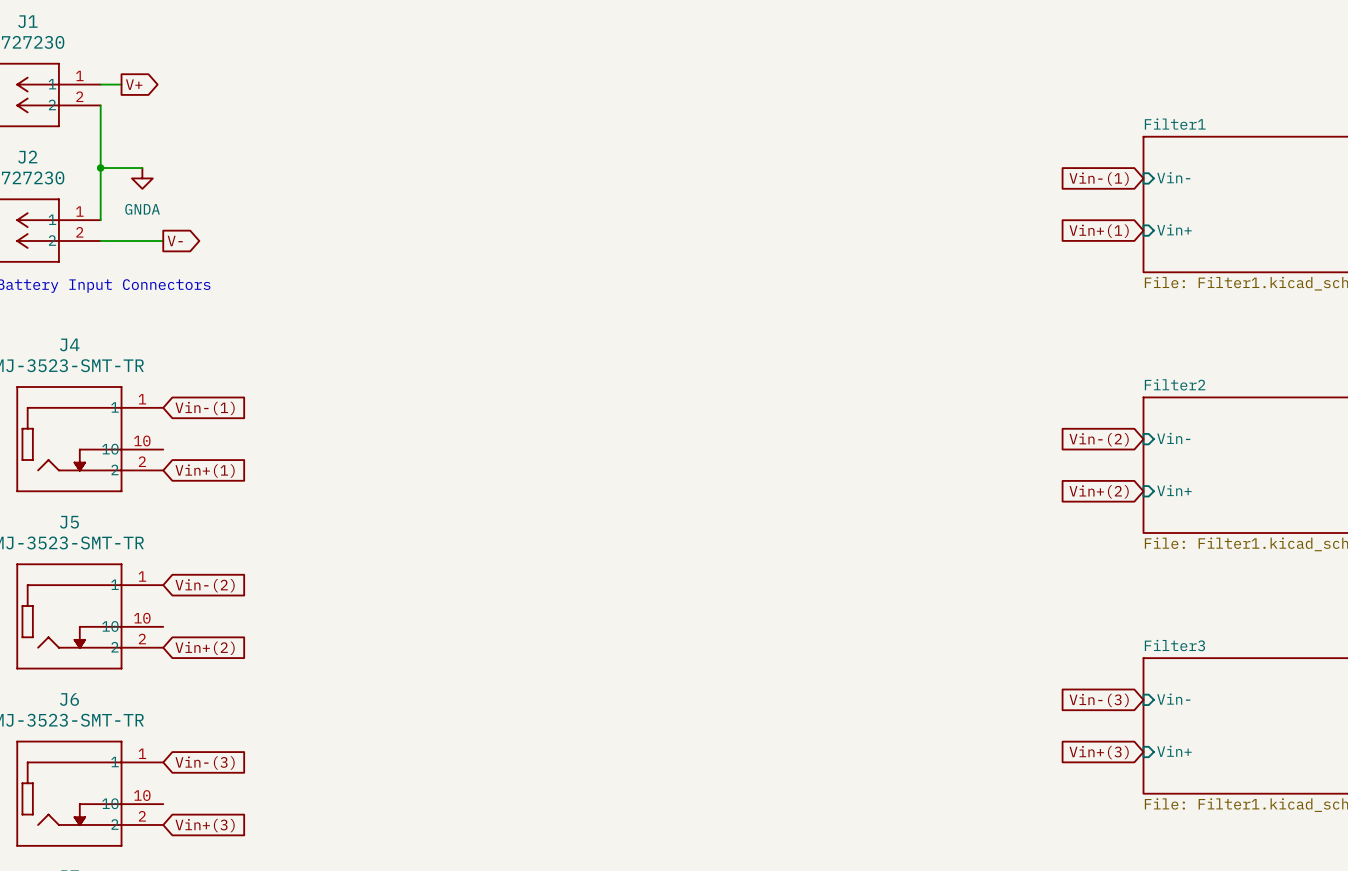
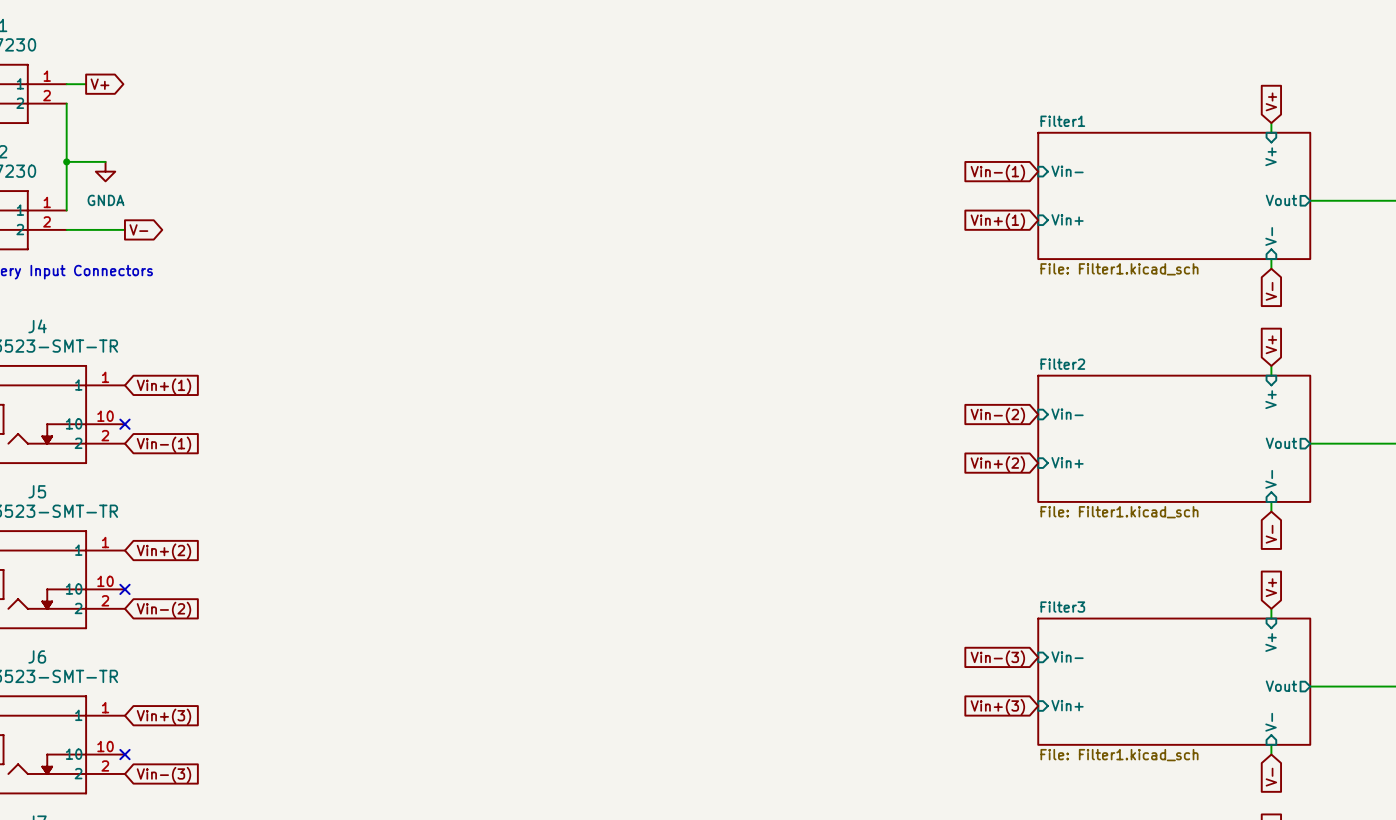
global label: Vin-(1) (205, 408) -> Vin+(1) (163, 386)
no-connect mark: none -> (124, 424)
global label: Vin+(1) (205, 470) -> Vin-(1) (163, 444)
global label: Vin-(2) (205, 585) -> Vin+(2) (163, 551)
no-connect mark: none -> (124, 589)
global label: Vin+(2) (205, 648) -> Vin-(2) (163, 609)
global label: Vin-(3) (205, 762) -> Vin+(3) (163, 716)
no-connect mark: none -> (124, 754)
global label: Vin+(3) (205, 825) -> Vin-(3) (163, 775)

